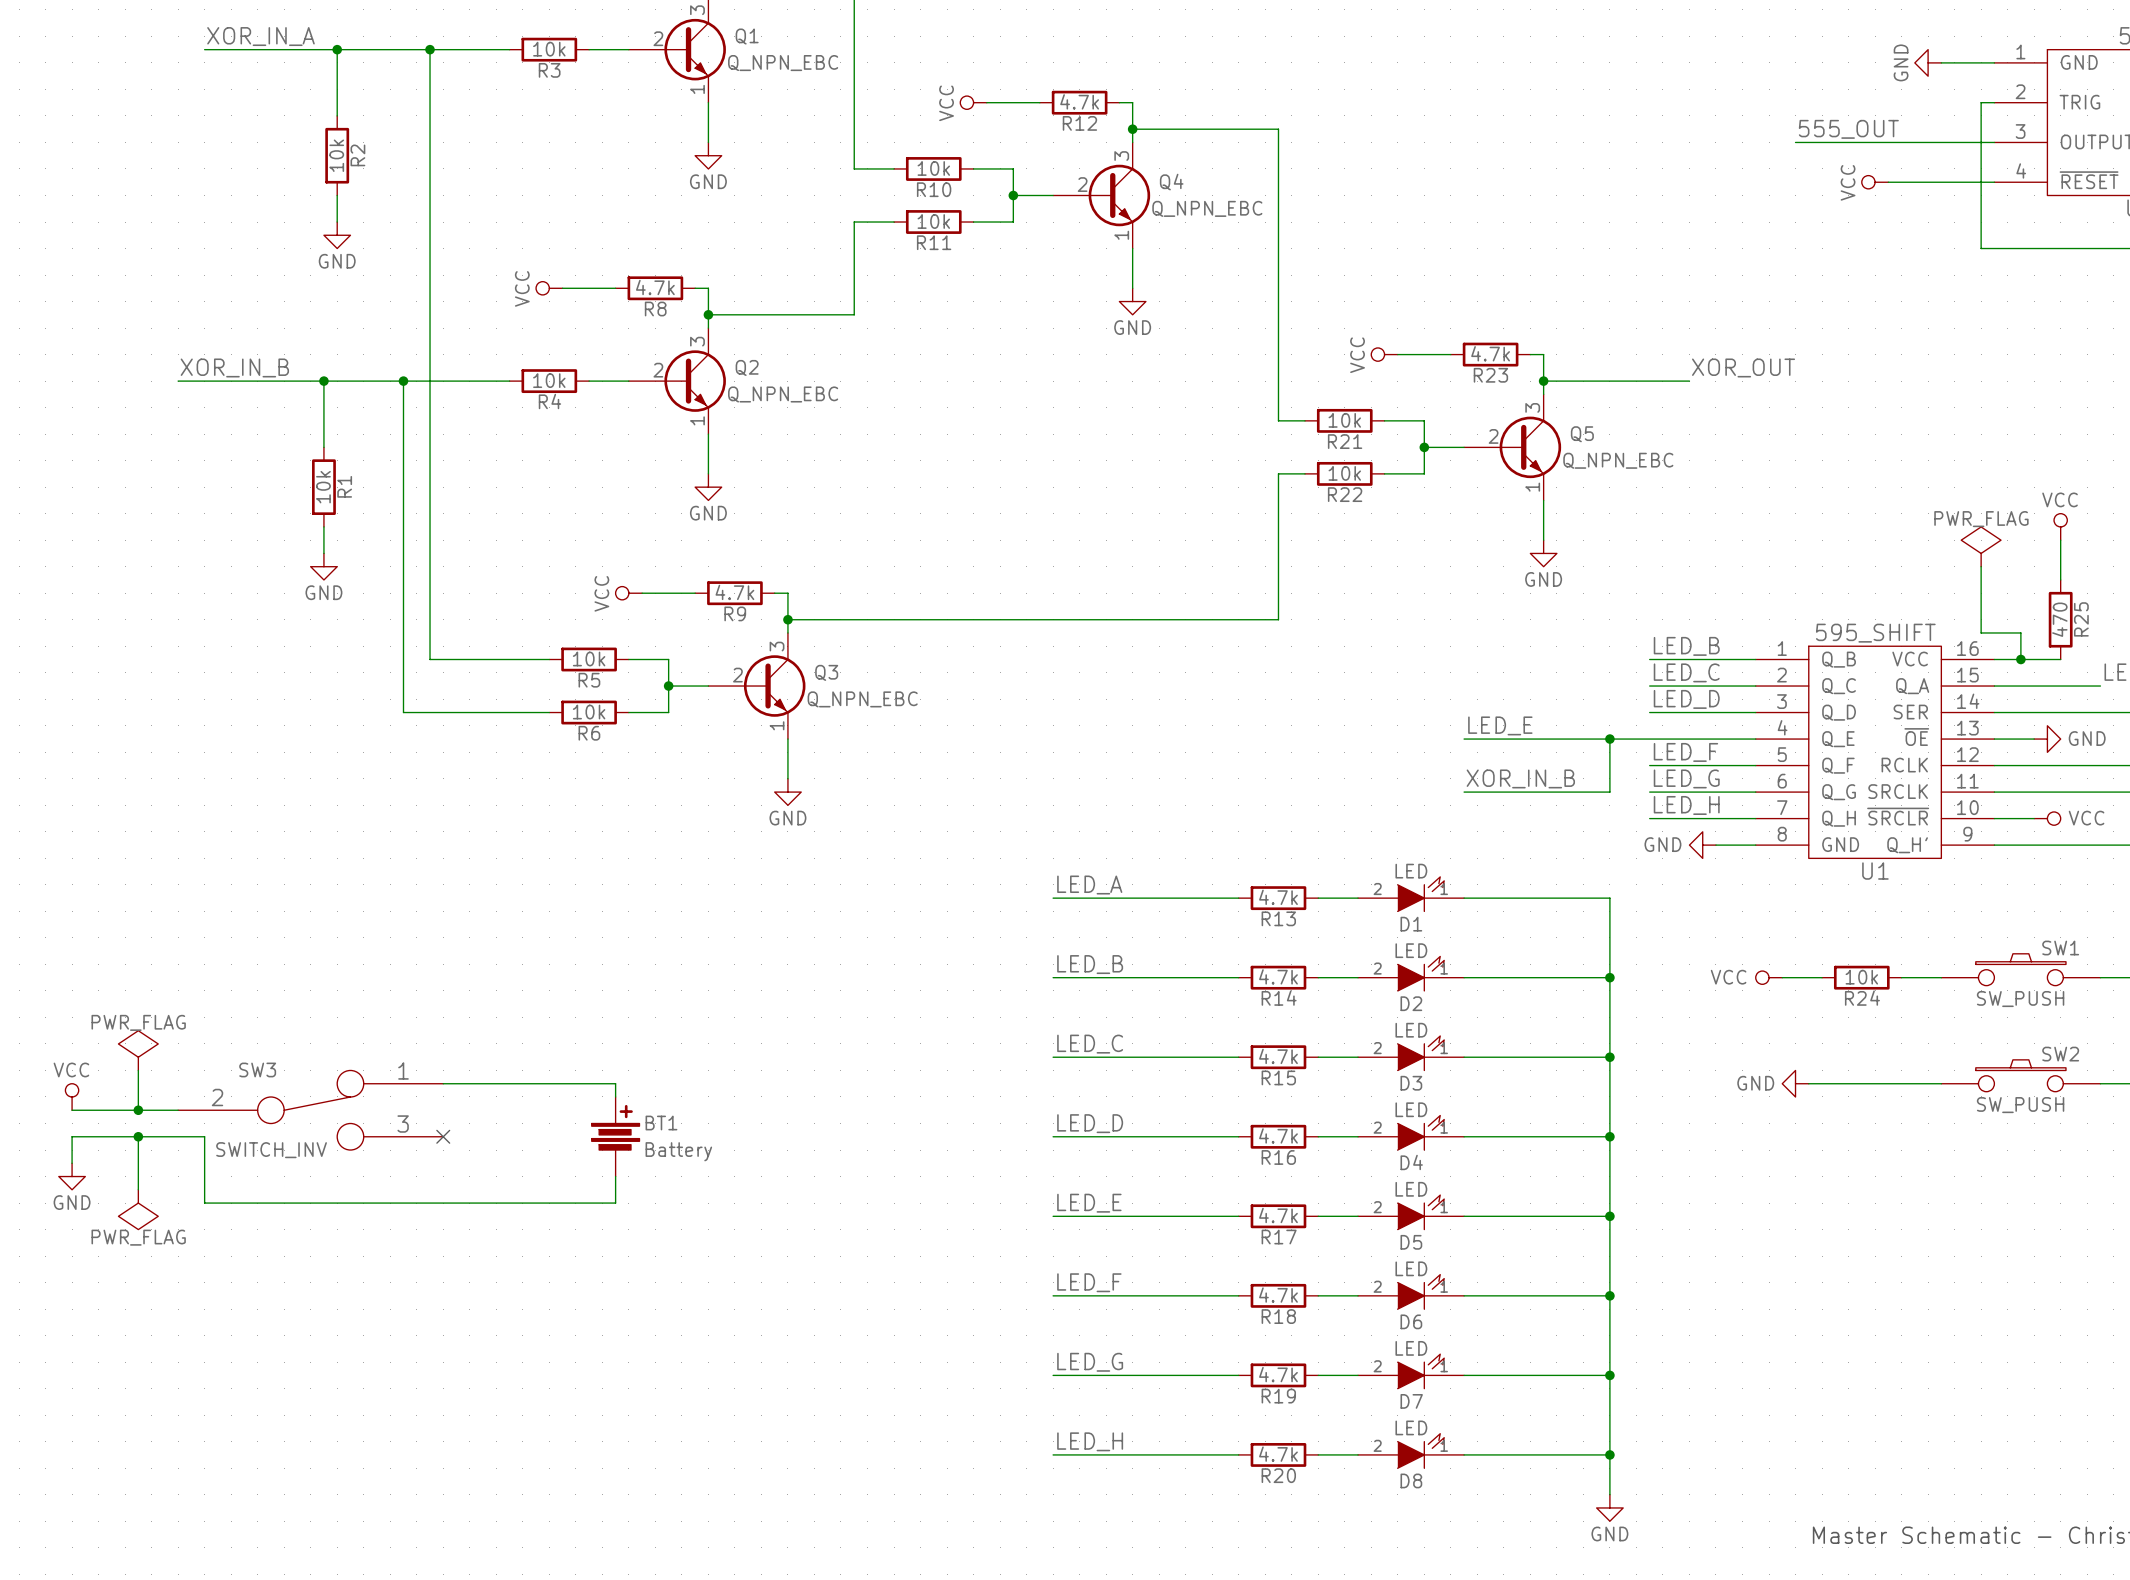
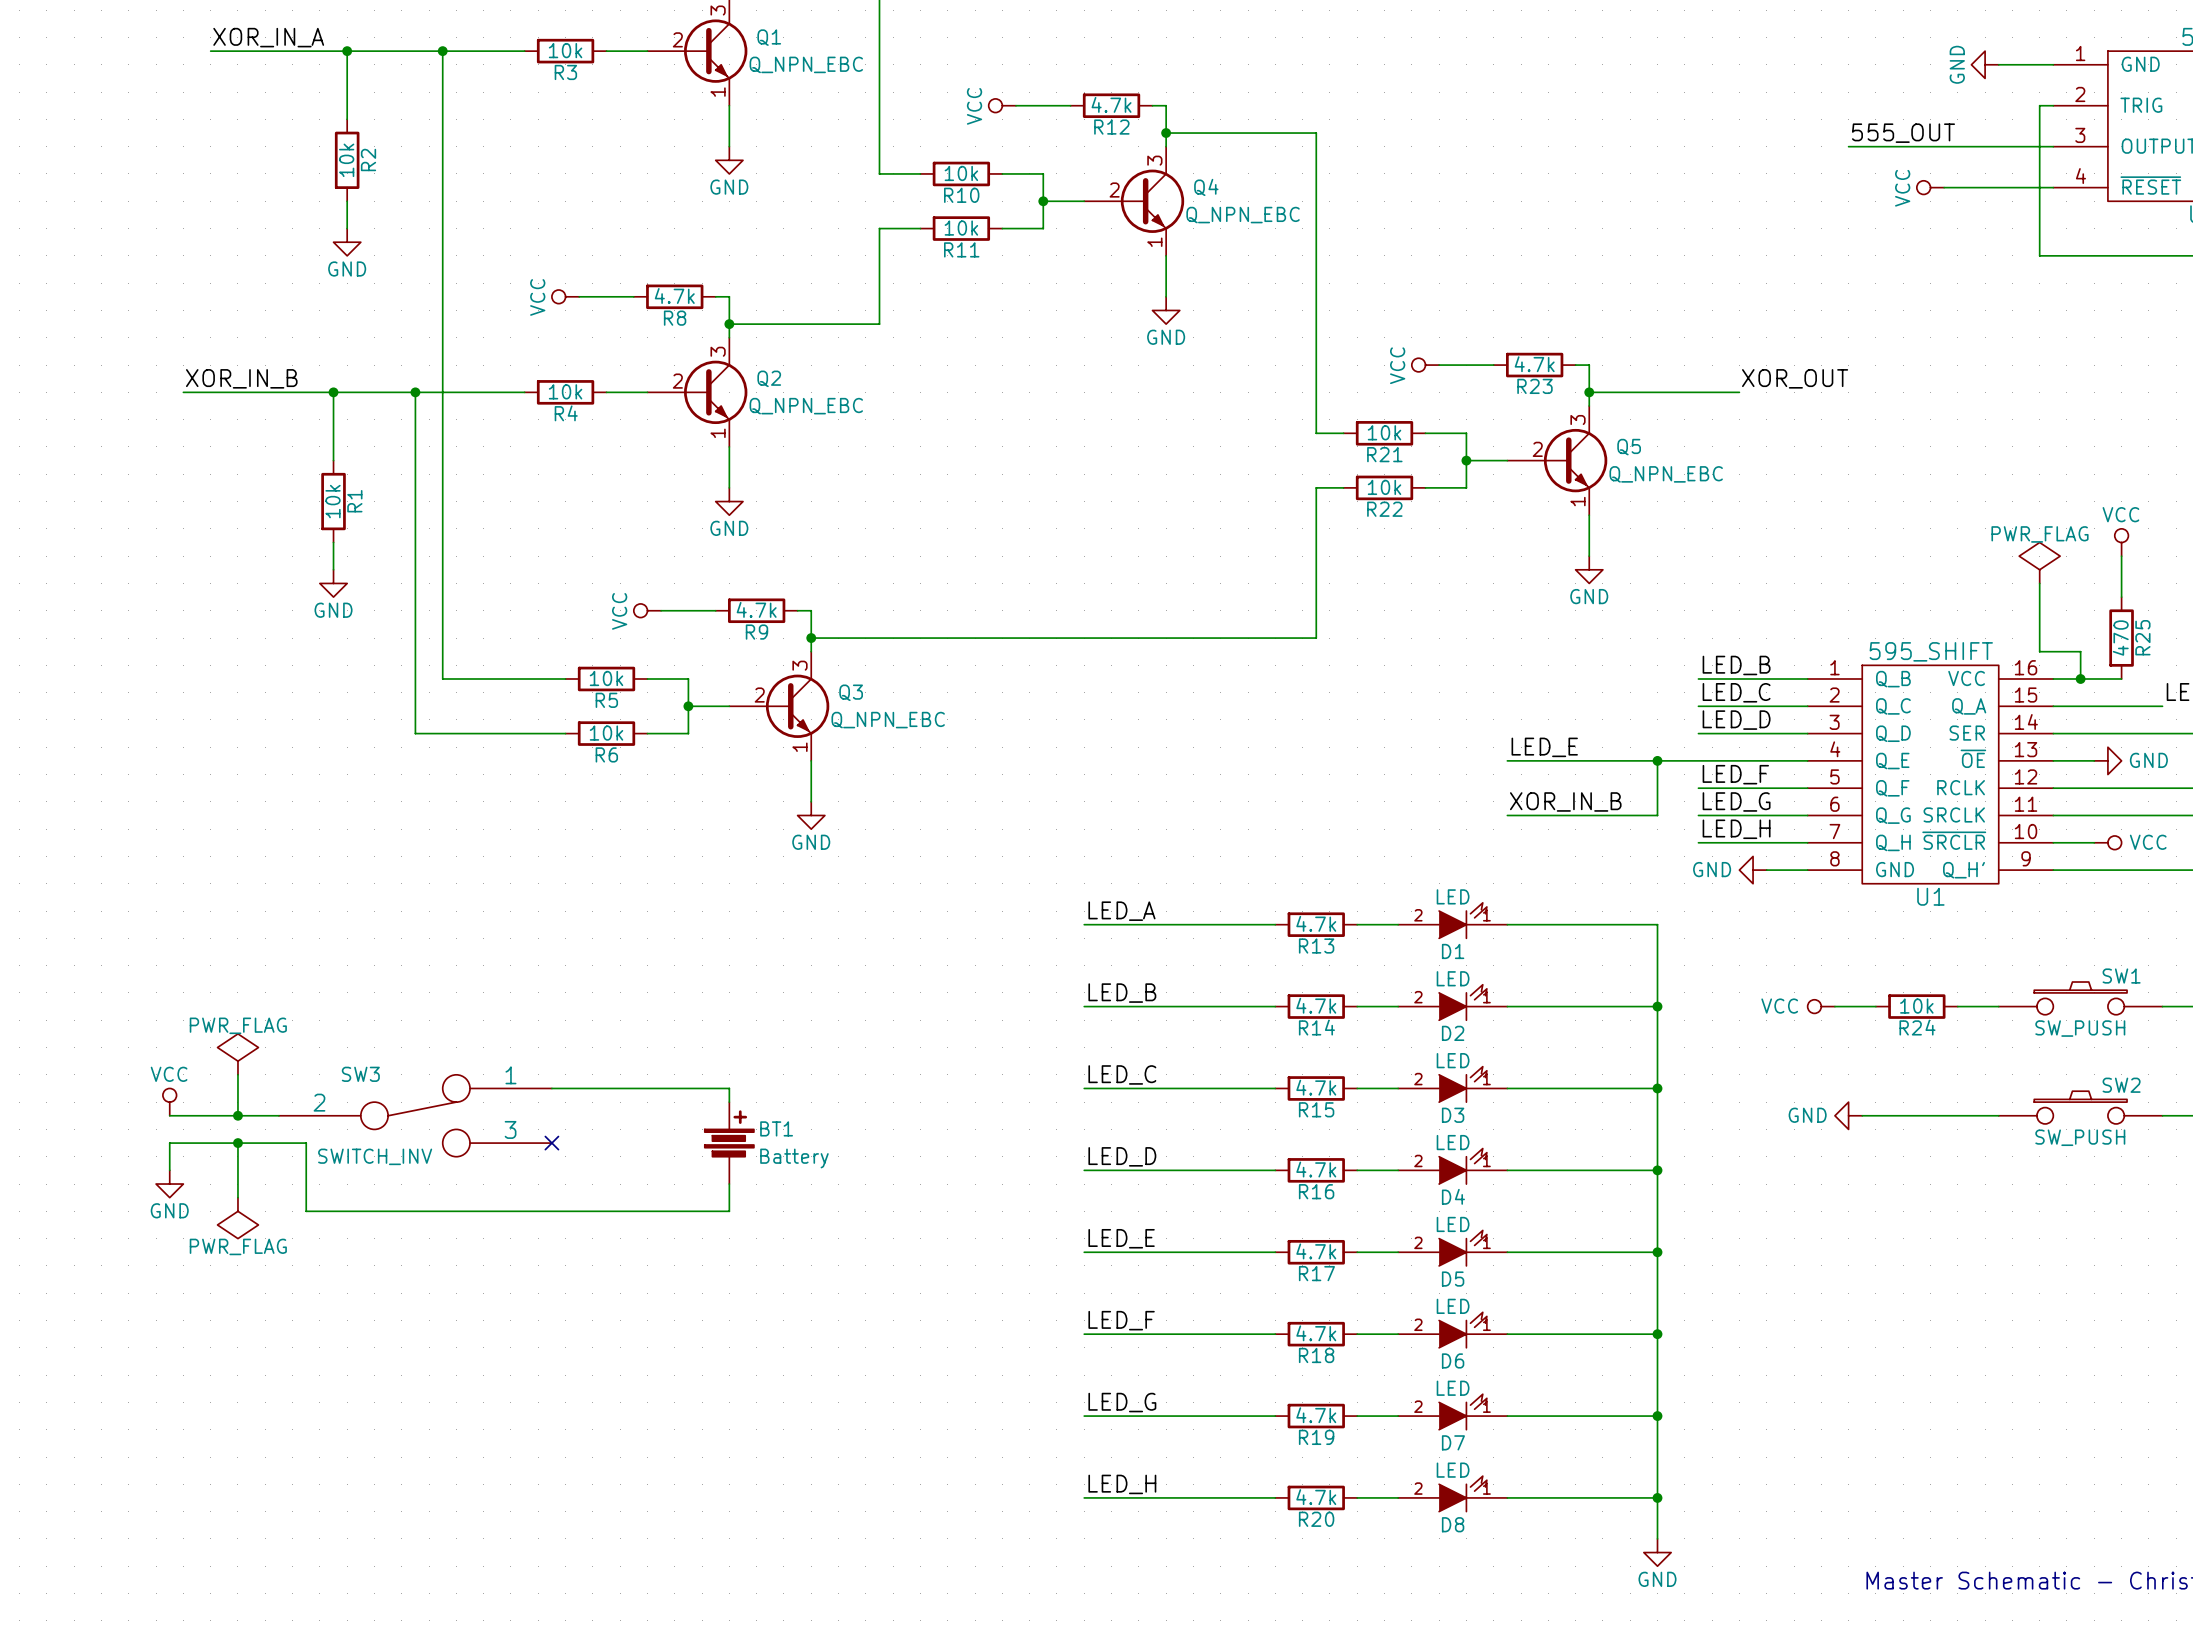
power symbol: none -> PWR_FLAG (237, 1054)
power symbol: PWR_FLAG (138, 1050) -> none
wire: (138, 1070) (138, 1110) -> (237, 1074) (237, 1115)
wire: none -> (169, 1115) (278, 1115)
junction: none -> (237, 1115)
wire: (443, 1083) (615, 1083) (615, 1096) -> (551, 1088) (729, 1088) (729, 1102)
power symbol position: VCC (72, 1096) -> VCC (169, 1102)
wire: (72, 1110) (164, 1110) -> (169, 1170) (169, 1143)
junction: (138, 1110) -> none
wire: none -> (183, 1143) (306, 1143) (306, 1211) (729, 1211) (729, 1184)
junction: none -> (237, 1143)
SW3 position: (310, 1110) -> (415, 1115)
no-connect mark: none -> (551, 1143)
wire: (138, 1136) (138, 1189) -> (237, 1143) (237, 1197)
junction: (138, 1136) -> none
no-connect mark: (443, 1136) -> none
BT1 position: (615, 1136) -> (729, 1143)
wire: (72, 1163) (72, 1136) (204, 1136) (204, 1203) (615, 1203) (615, 1176) -> none
power symbol position: GND (72, 1176) -> GND (169, 1184)
power symbol: none -> PWR_FLAG (237, 1218)
power symbol: PWR_FLAG (138, 1209) -> none

